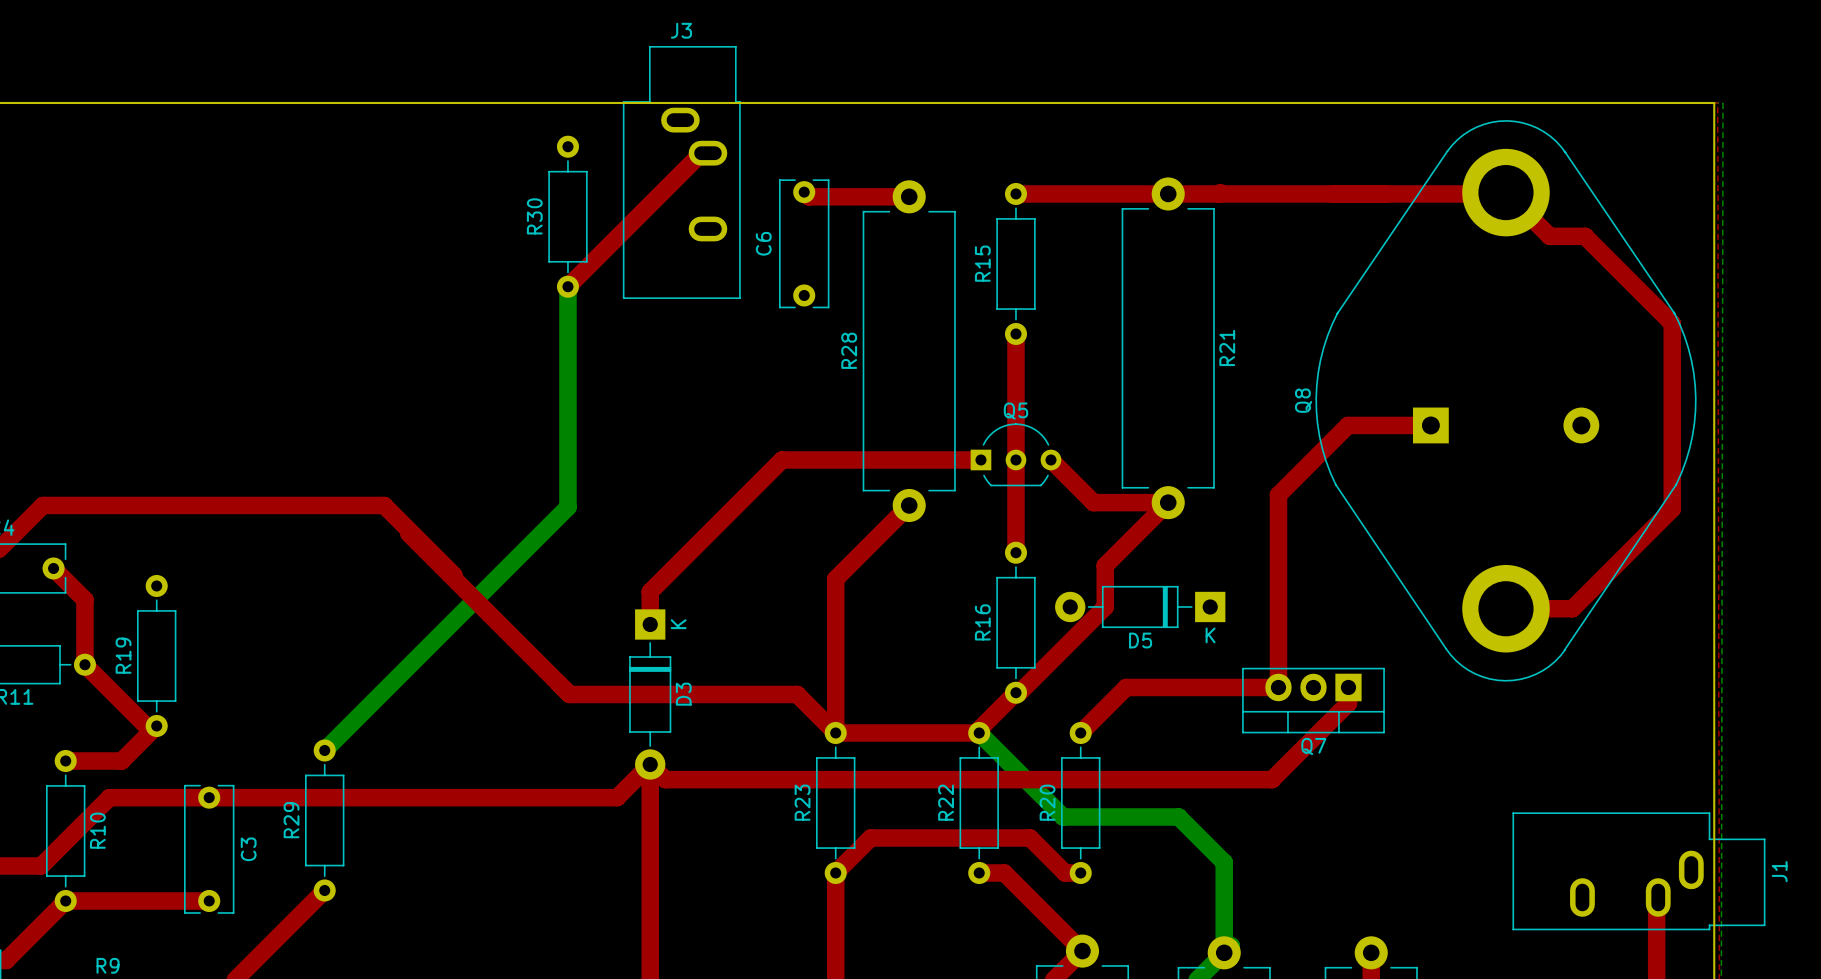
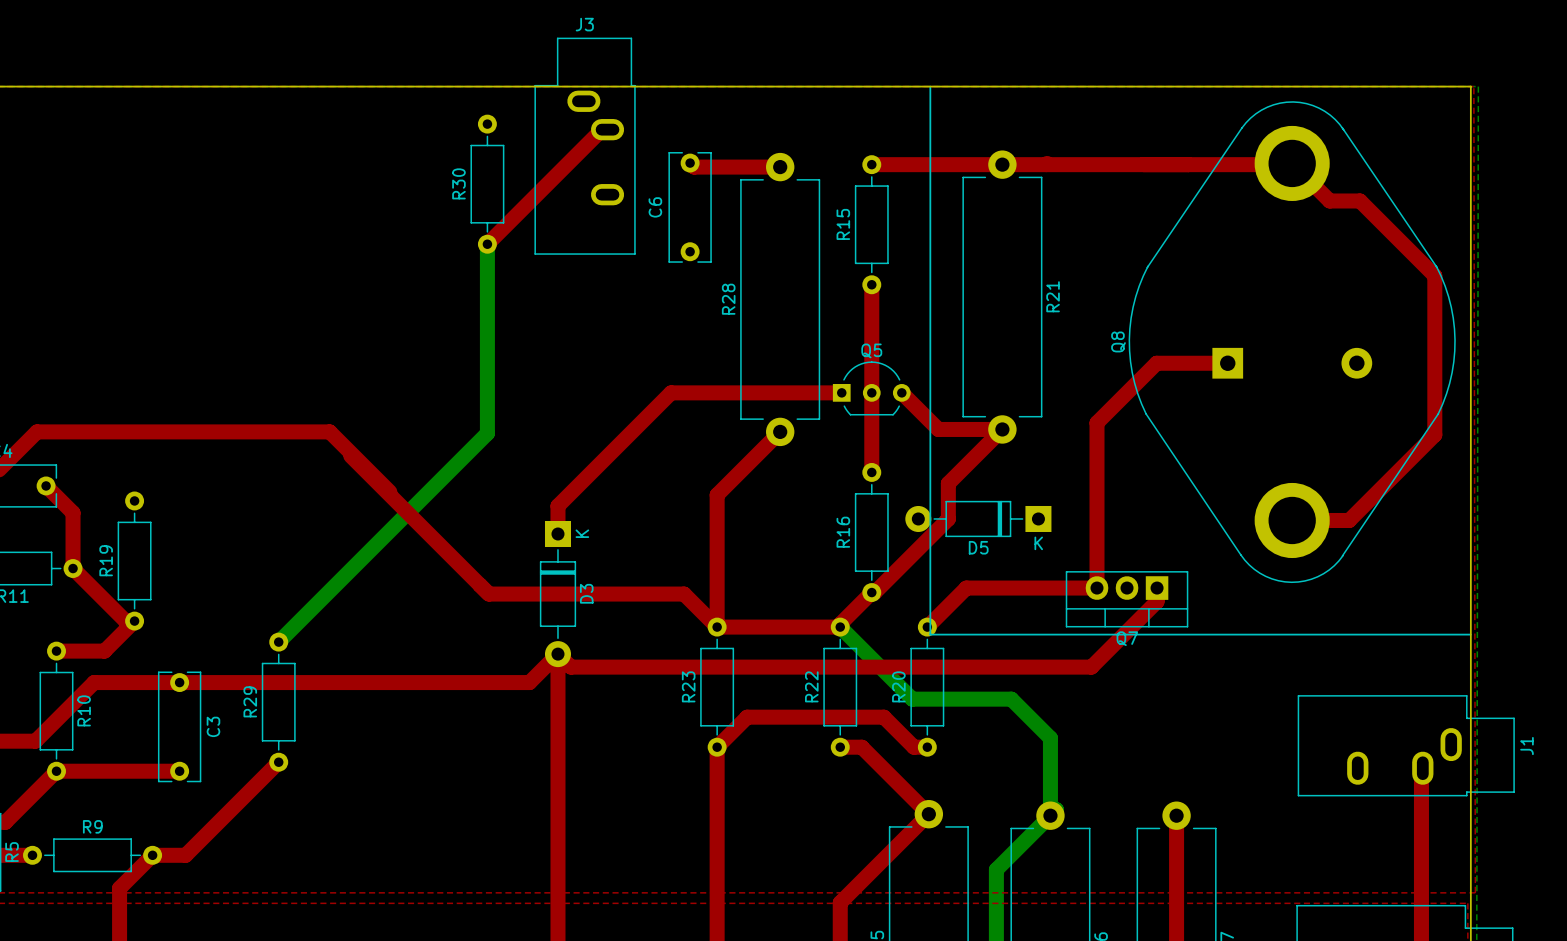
line: none -> (930, 86) (930, 634) (1470, 634)

